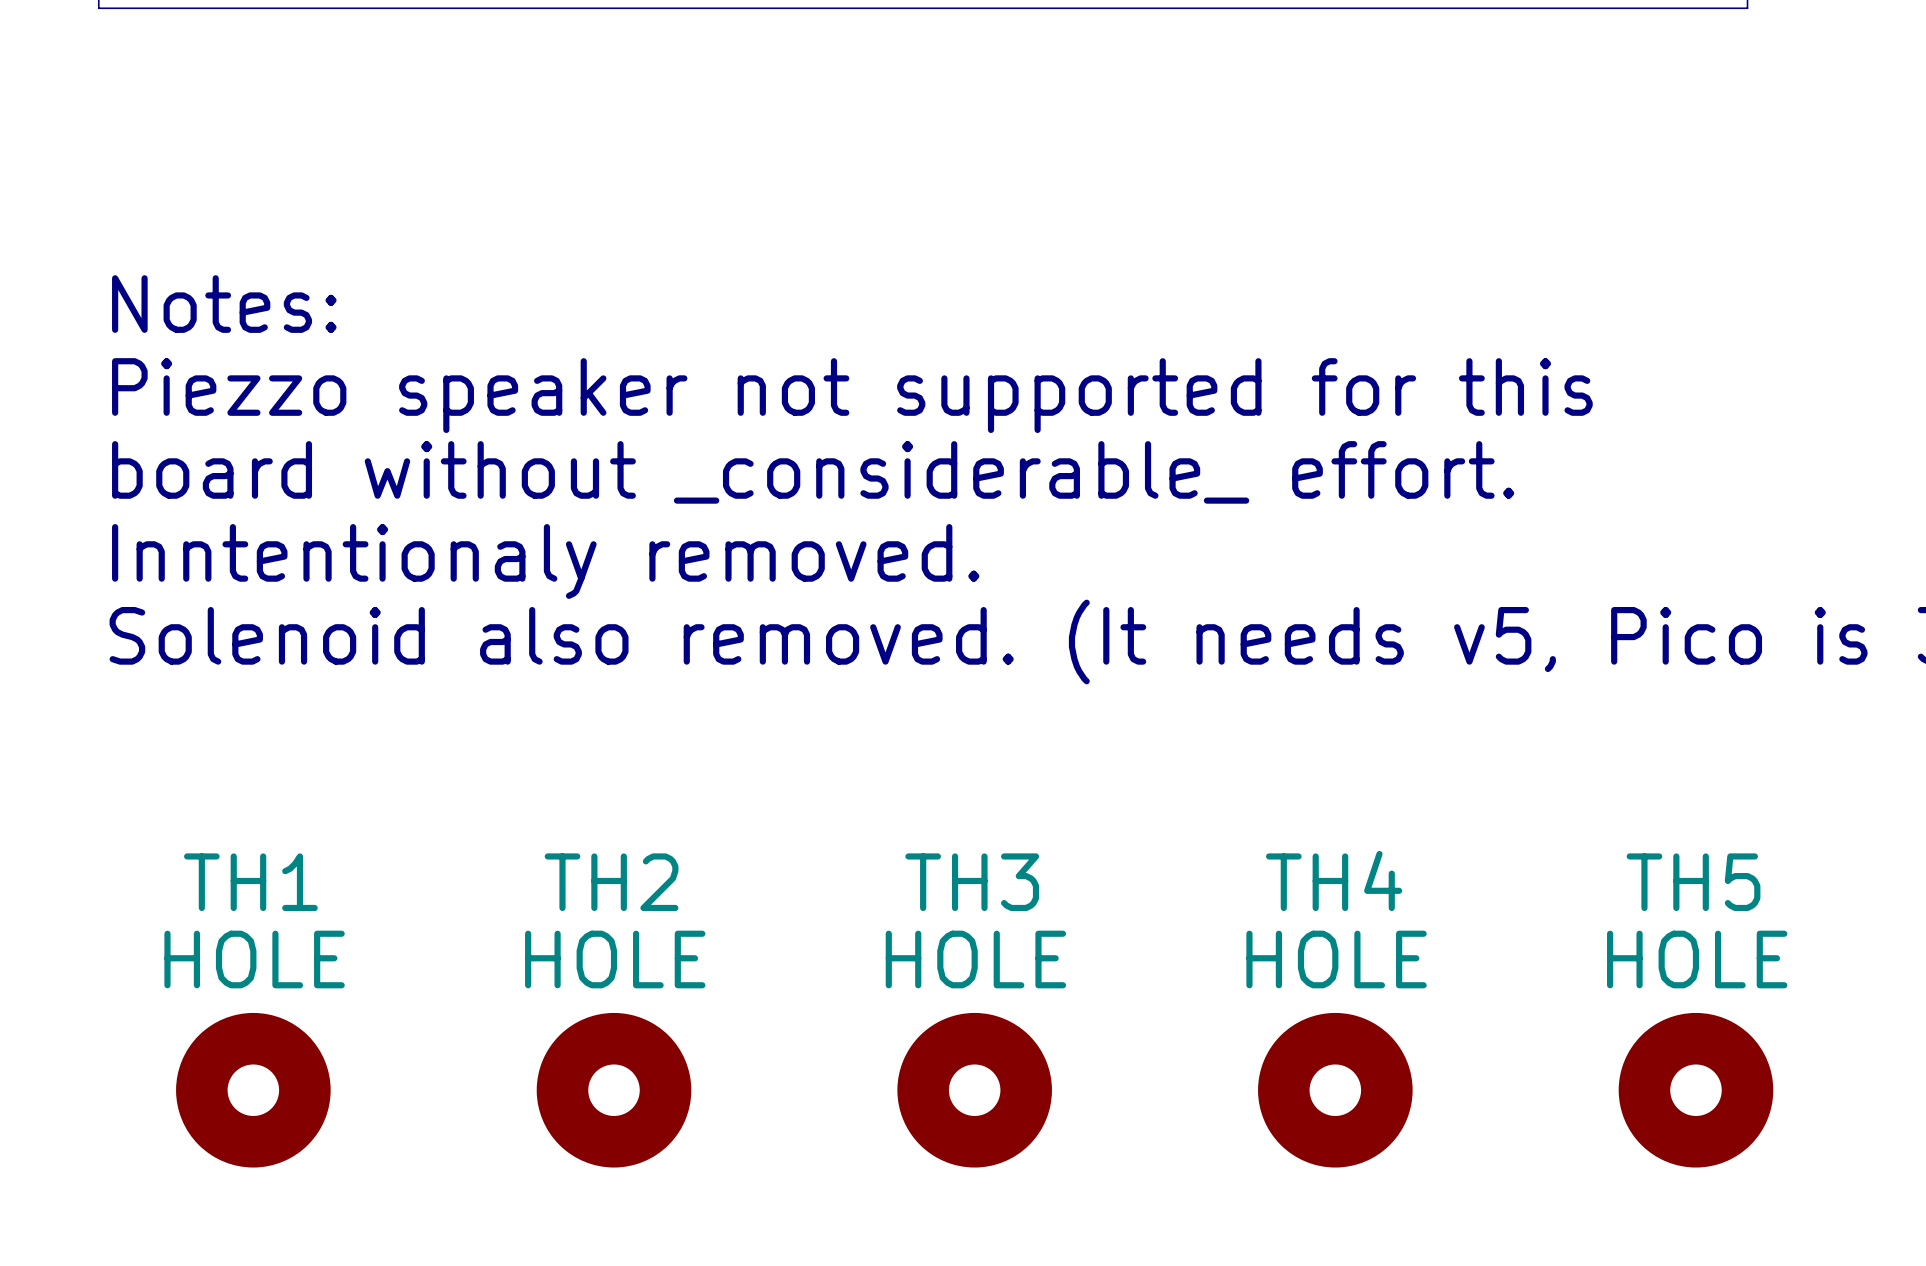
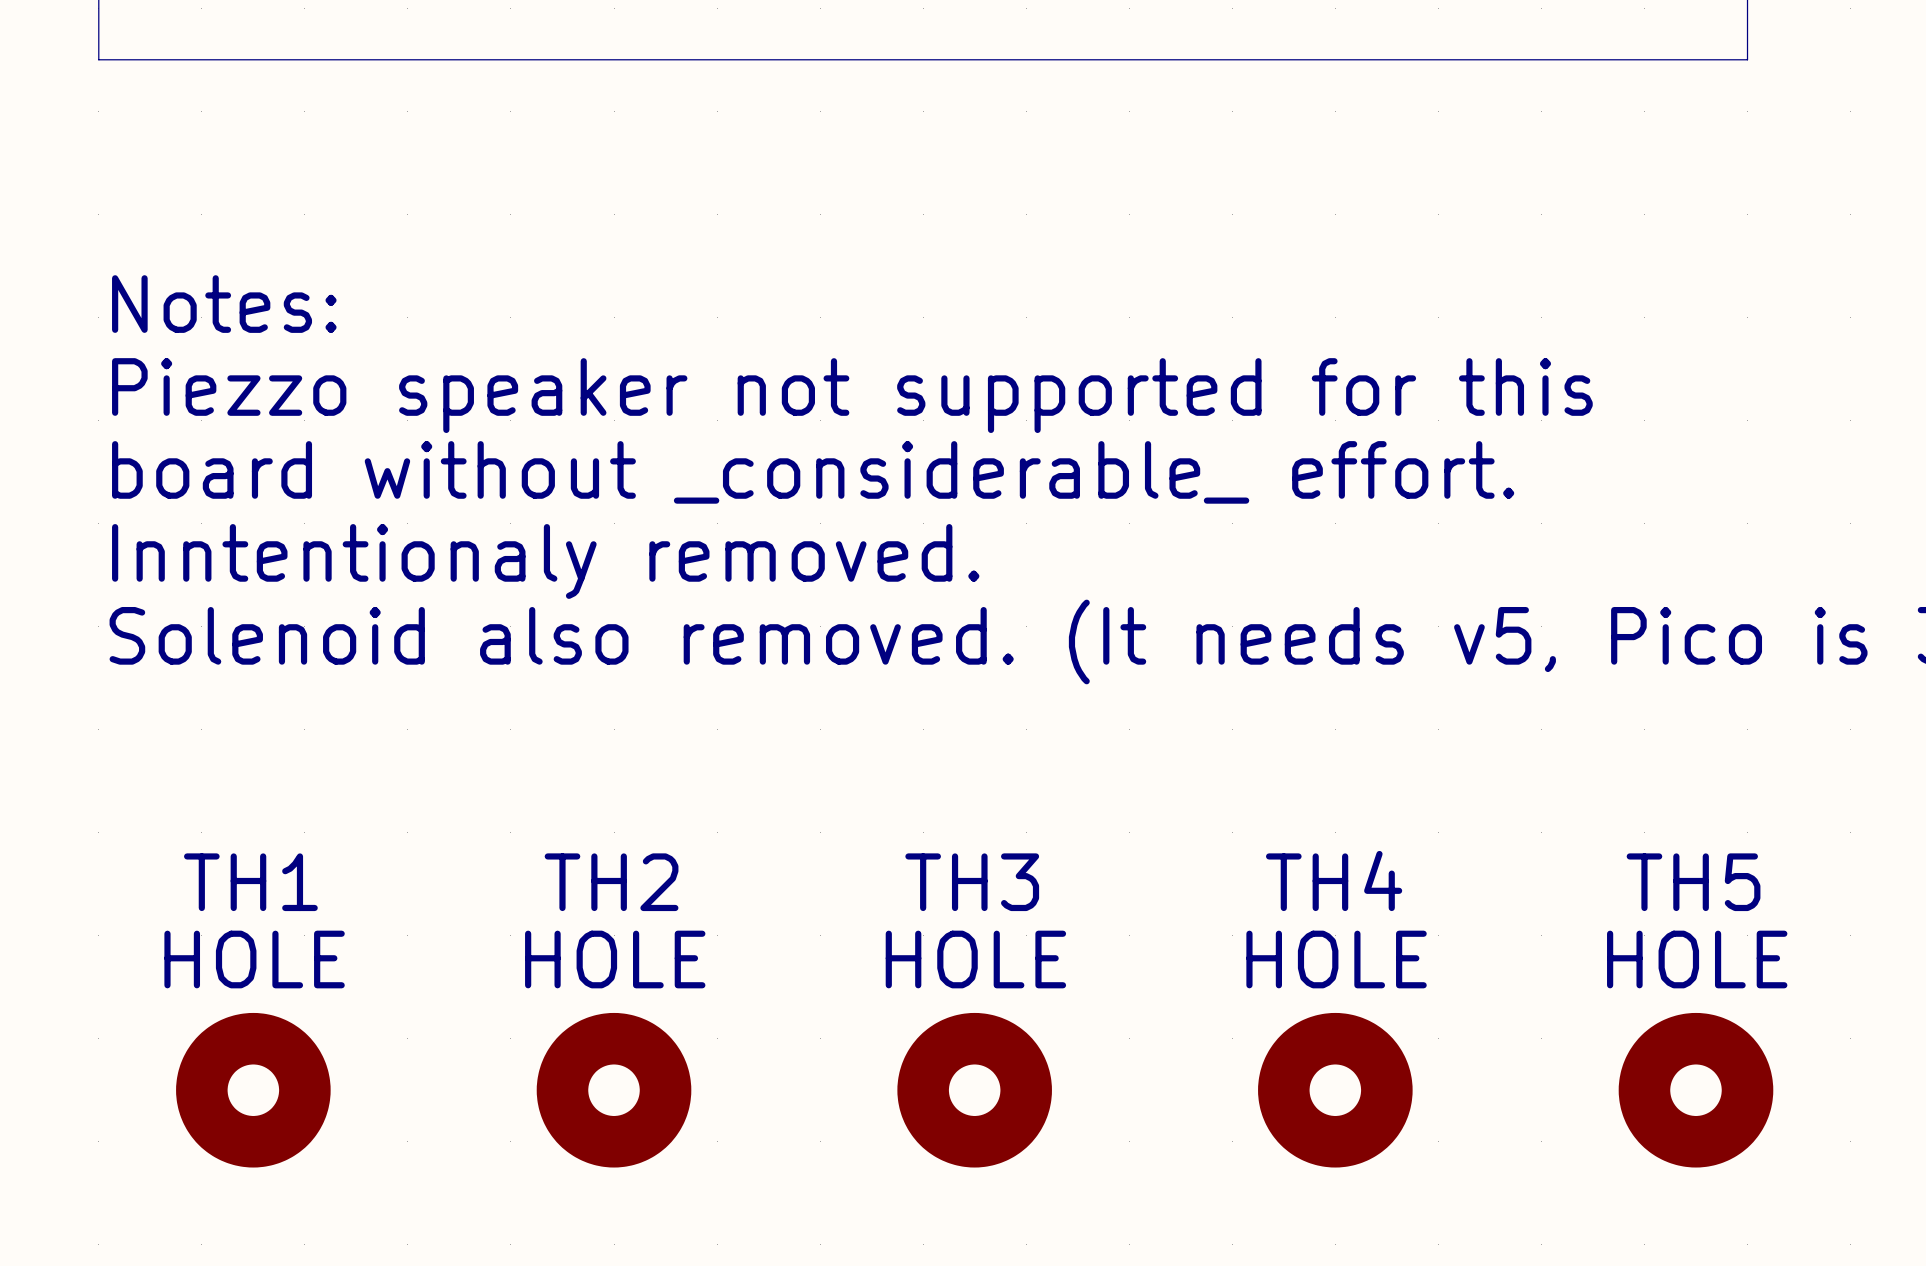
line: (98, 8) (1747, 8) -> (98, 8) (98, 59) (1747, 59) (1747, 8)

